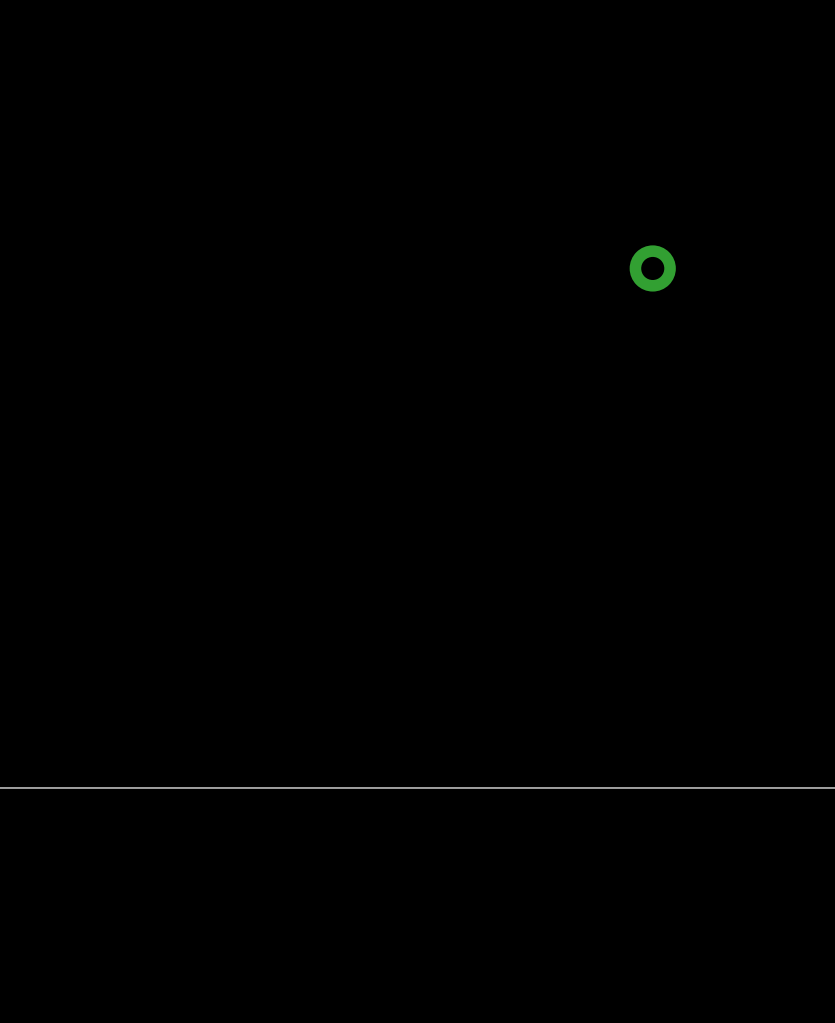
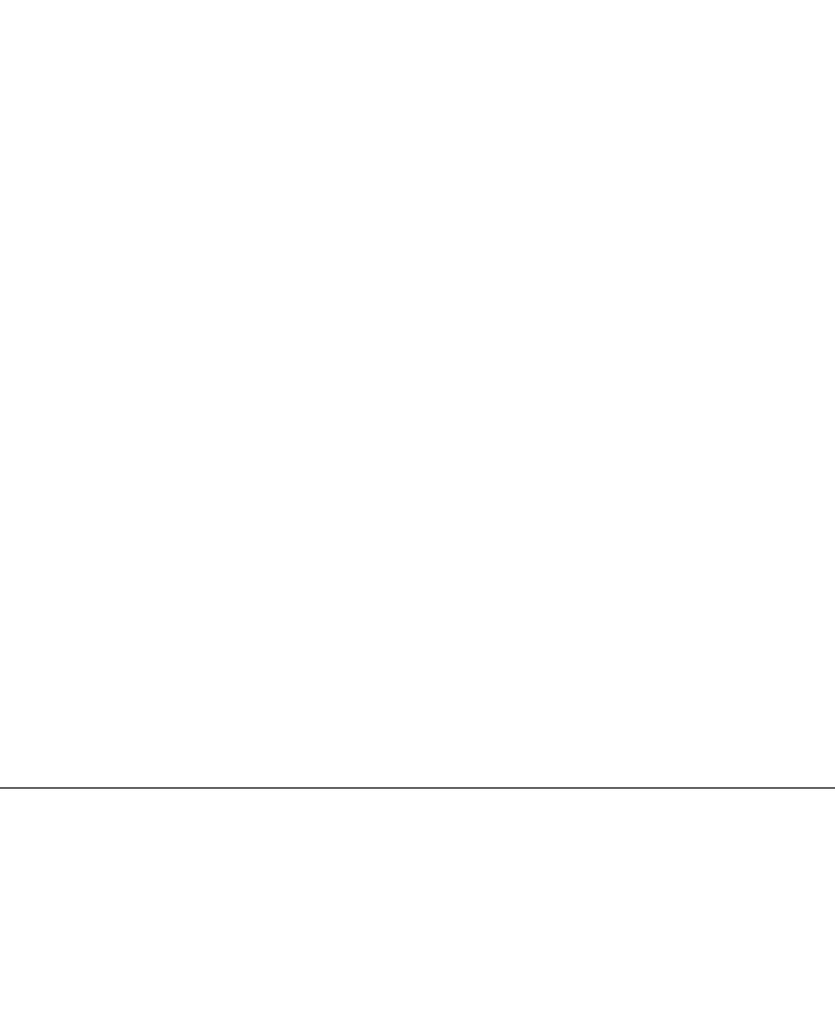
via: (652, 268) -> none

